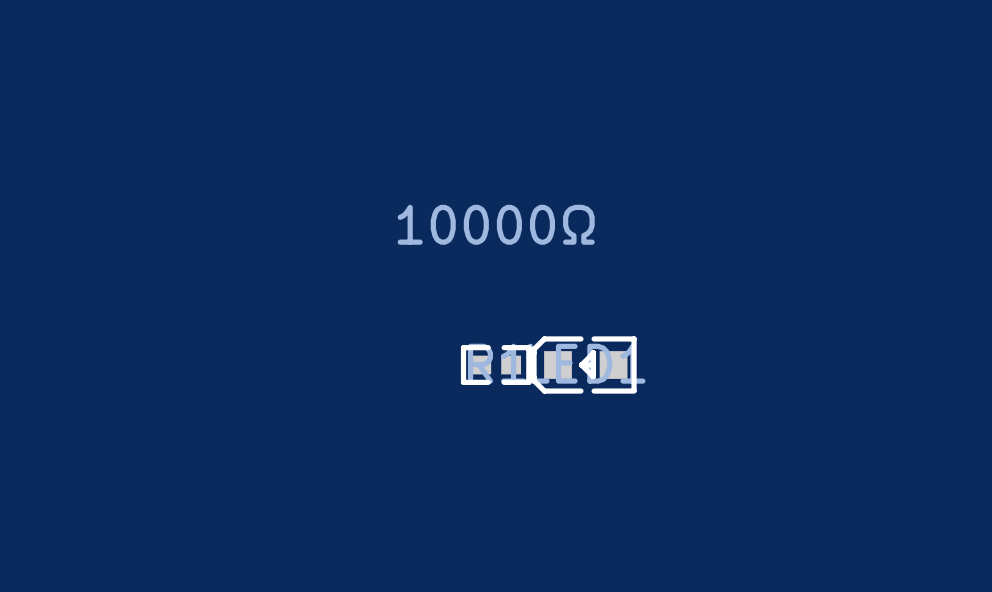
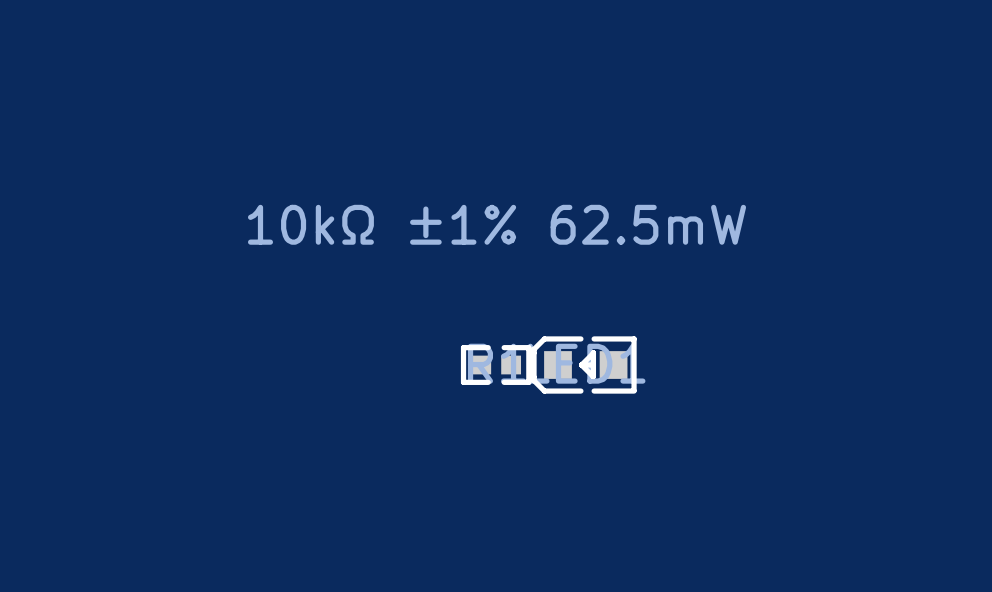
part value: 10000Ω (496, 224) -> 10kΩ ±1% 62.5mW (497, 224)

